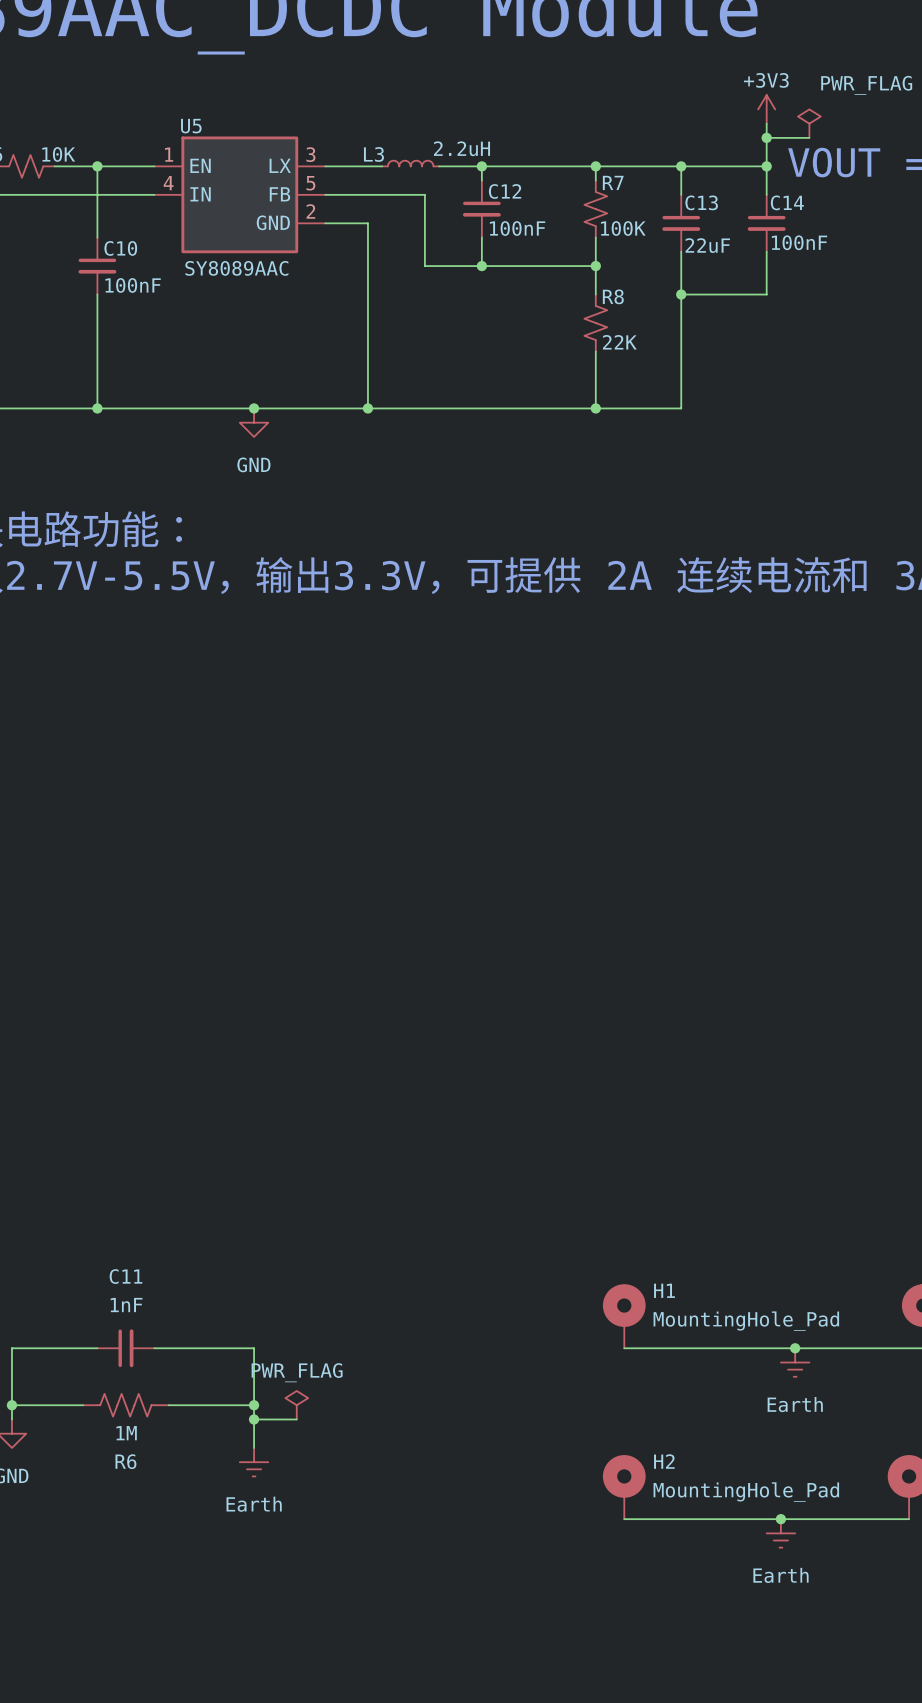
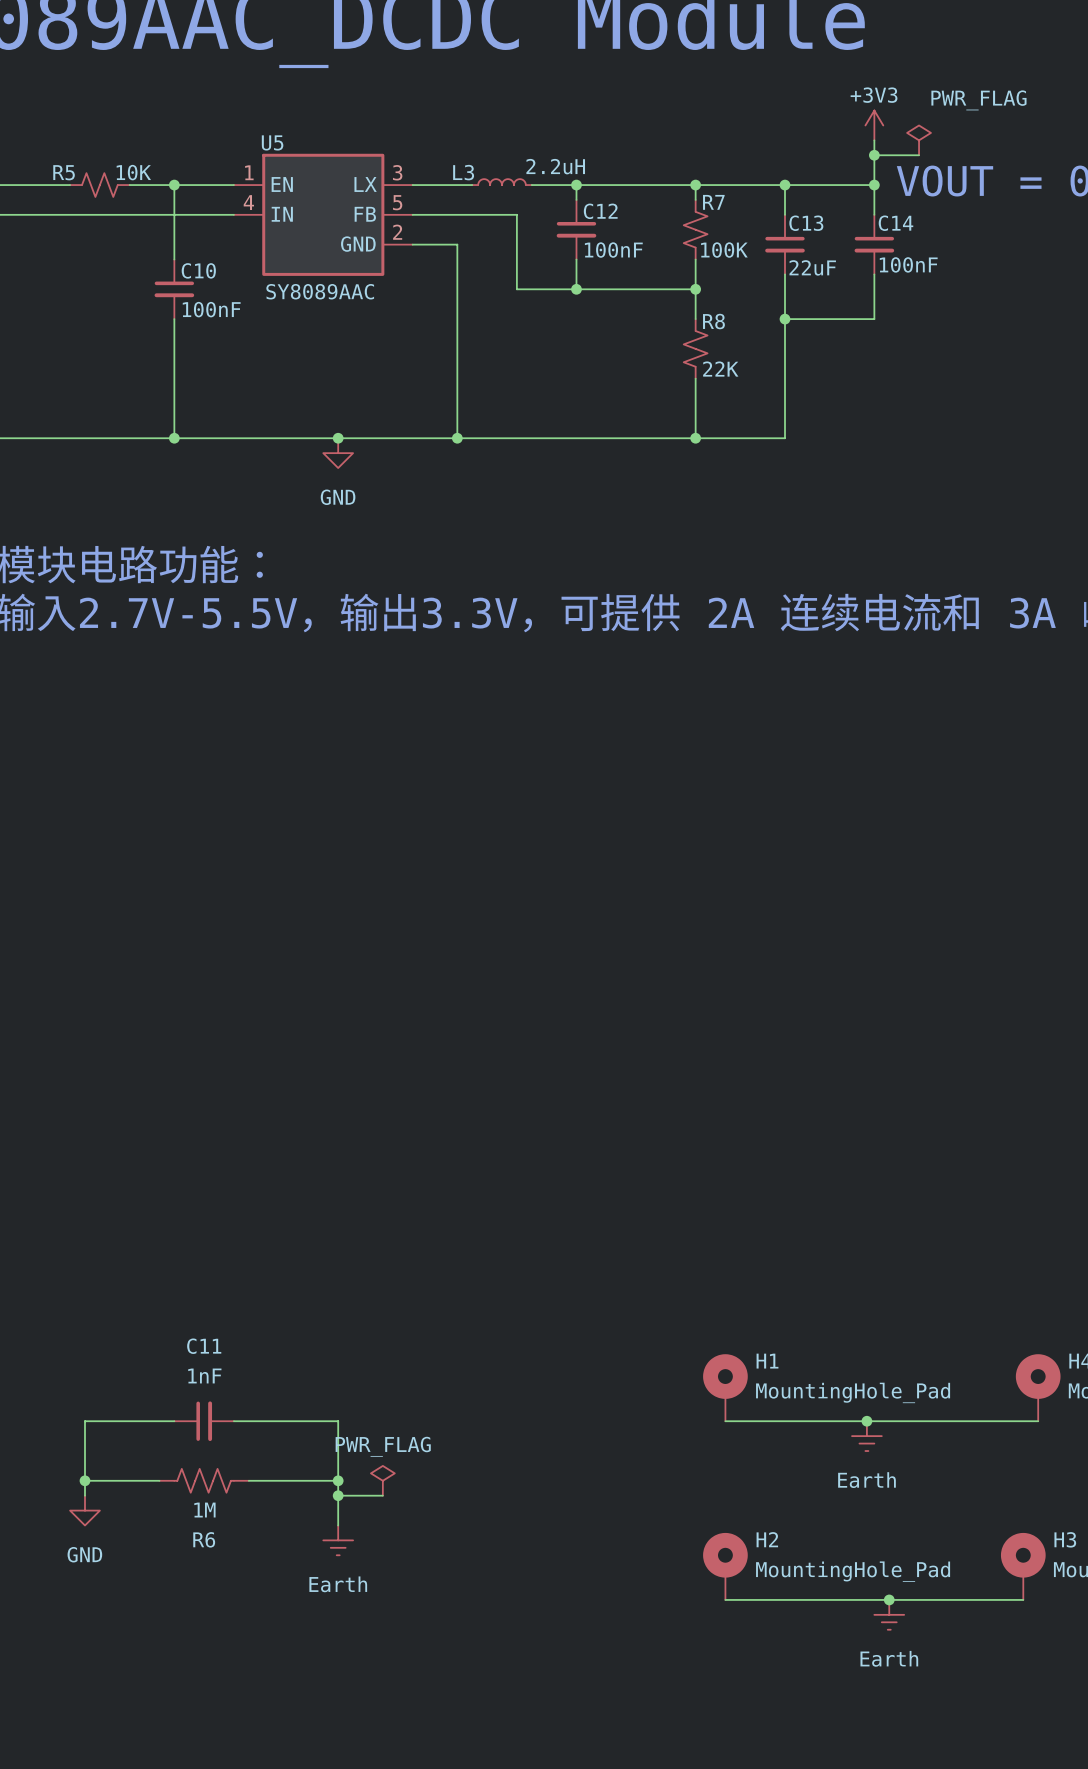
junction position: (795, 1348) -> (866, 1421)
power symbol position: Earth (795, 1362) -> Earth (866, 1436)

